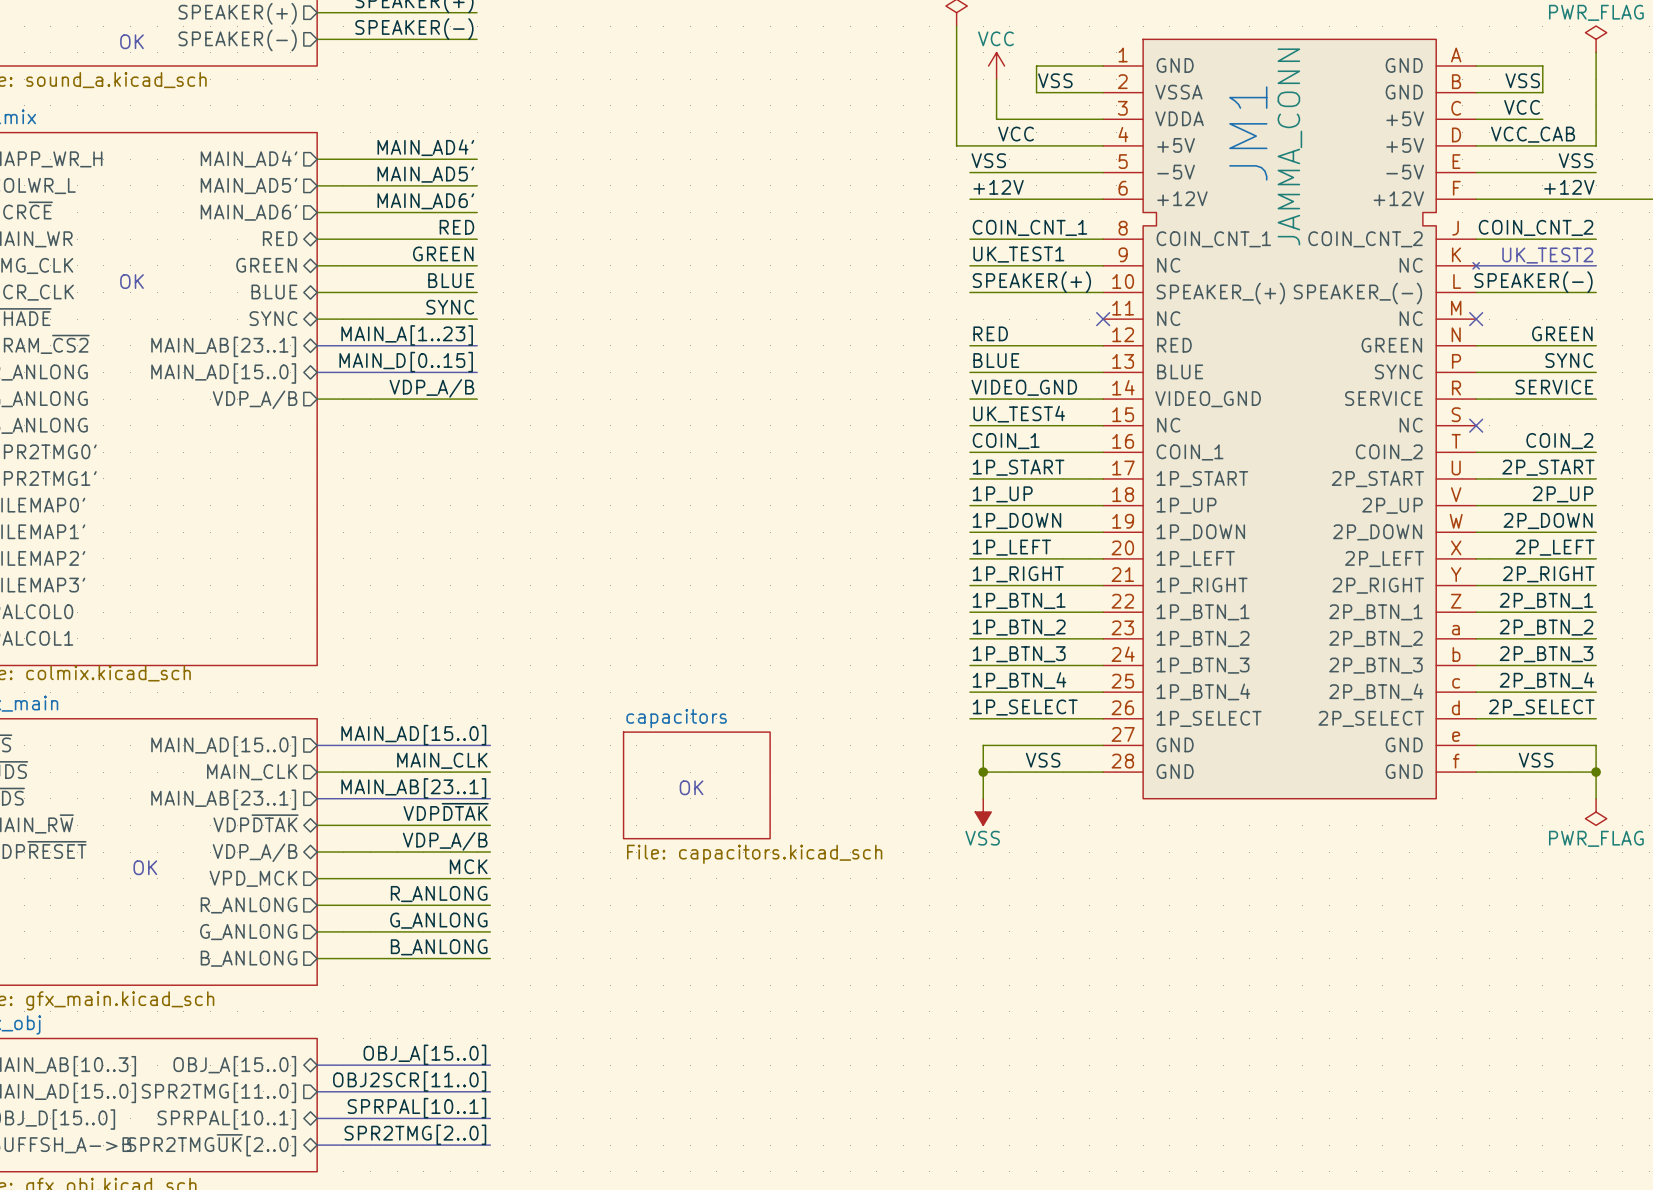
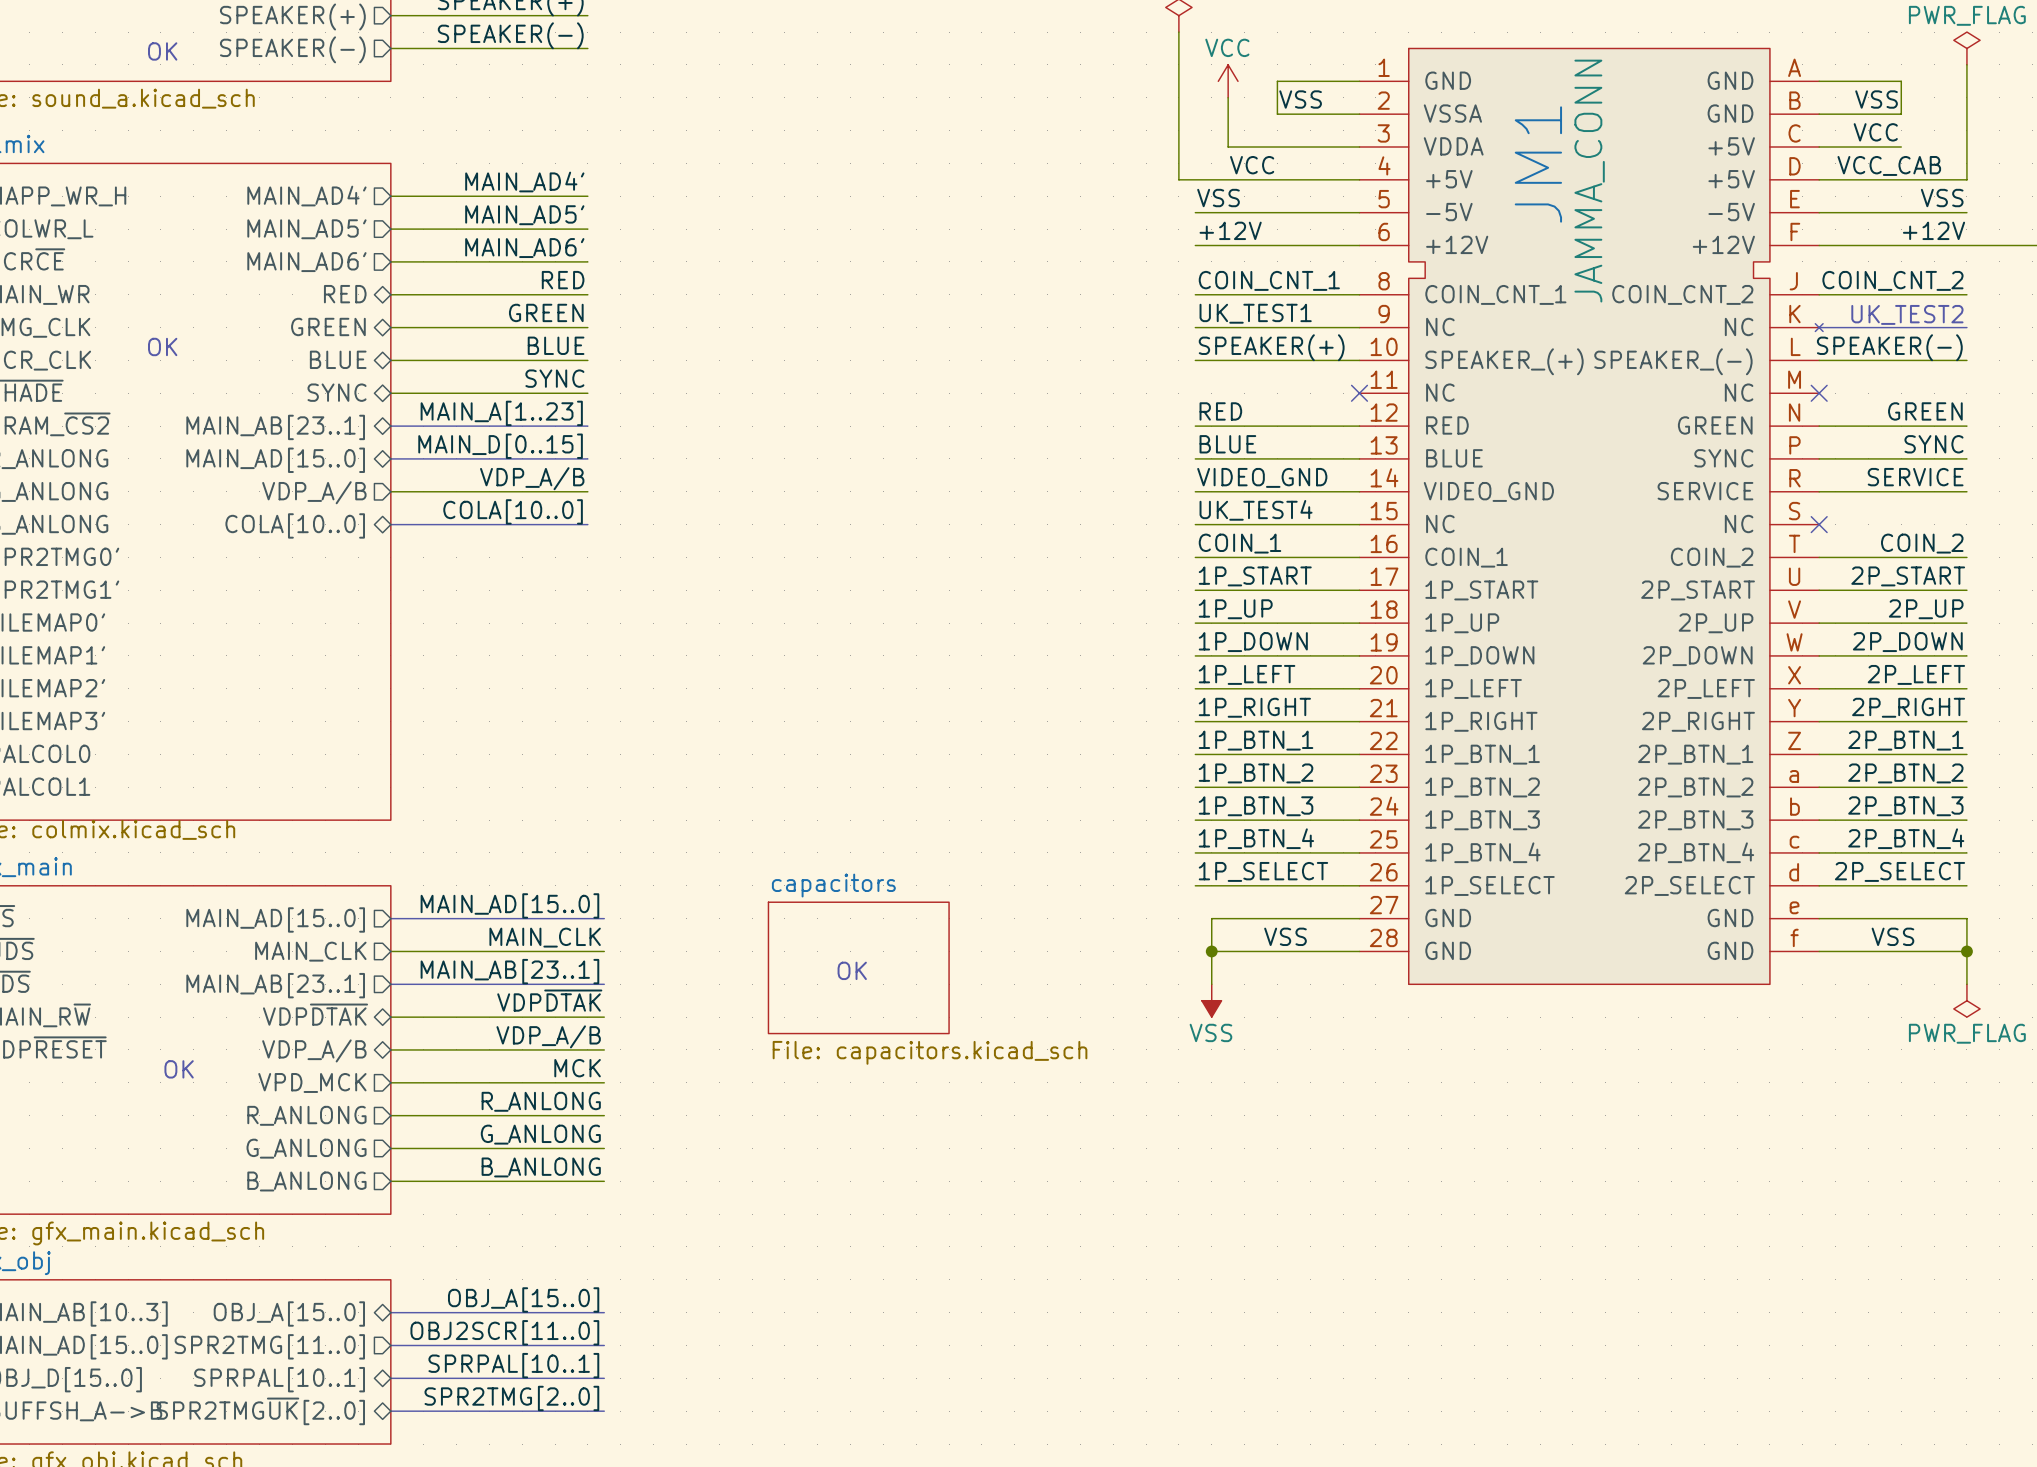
label: none -> COLA[10..0] (513, 511)
bus: none -> (390, 524) (587, 524)
sheet pin: none -> COLA[10..0] (295, 525)

